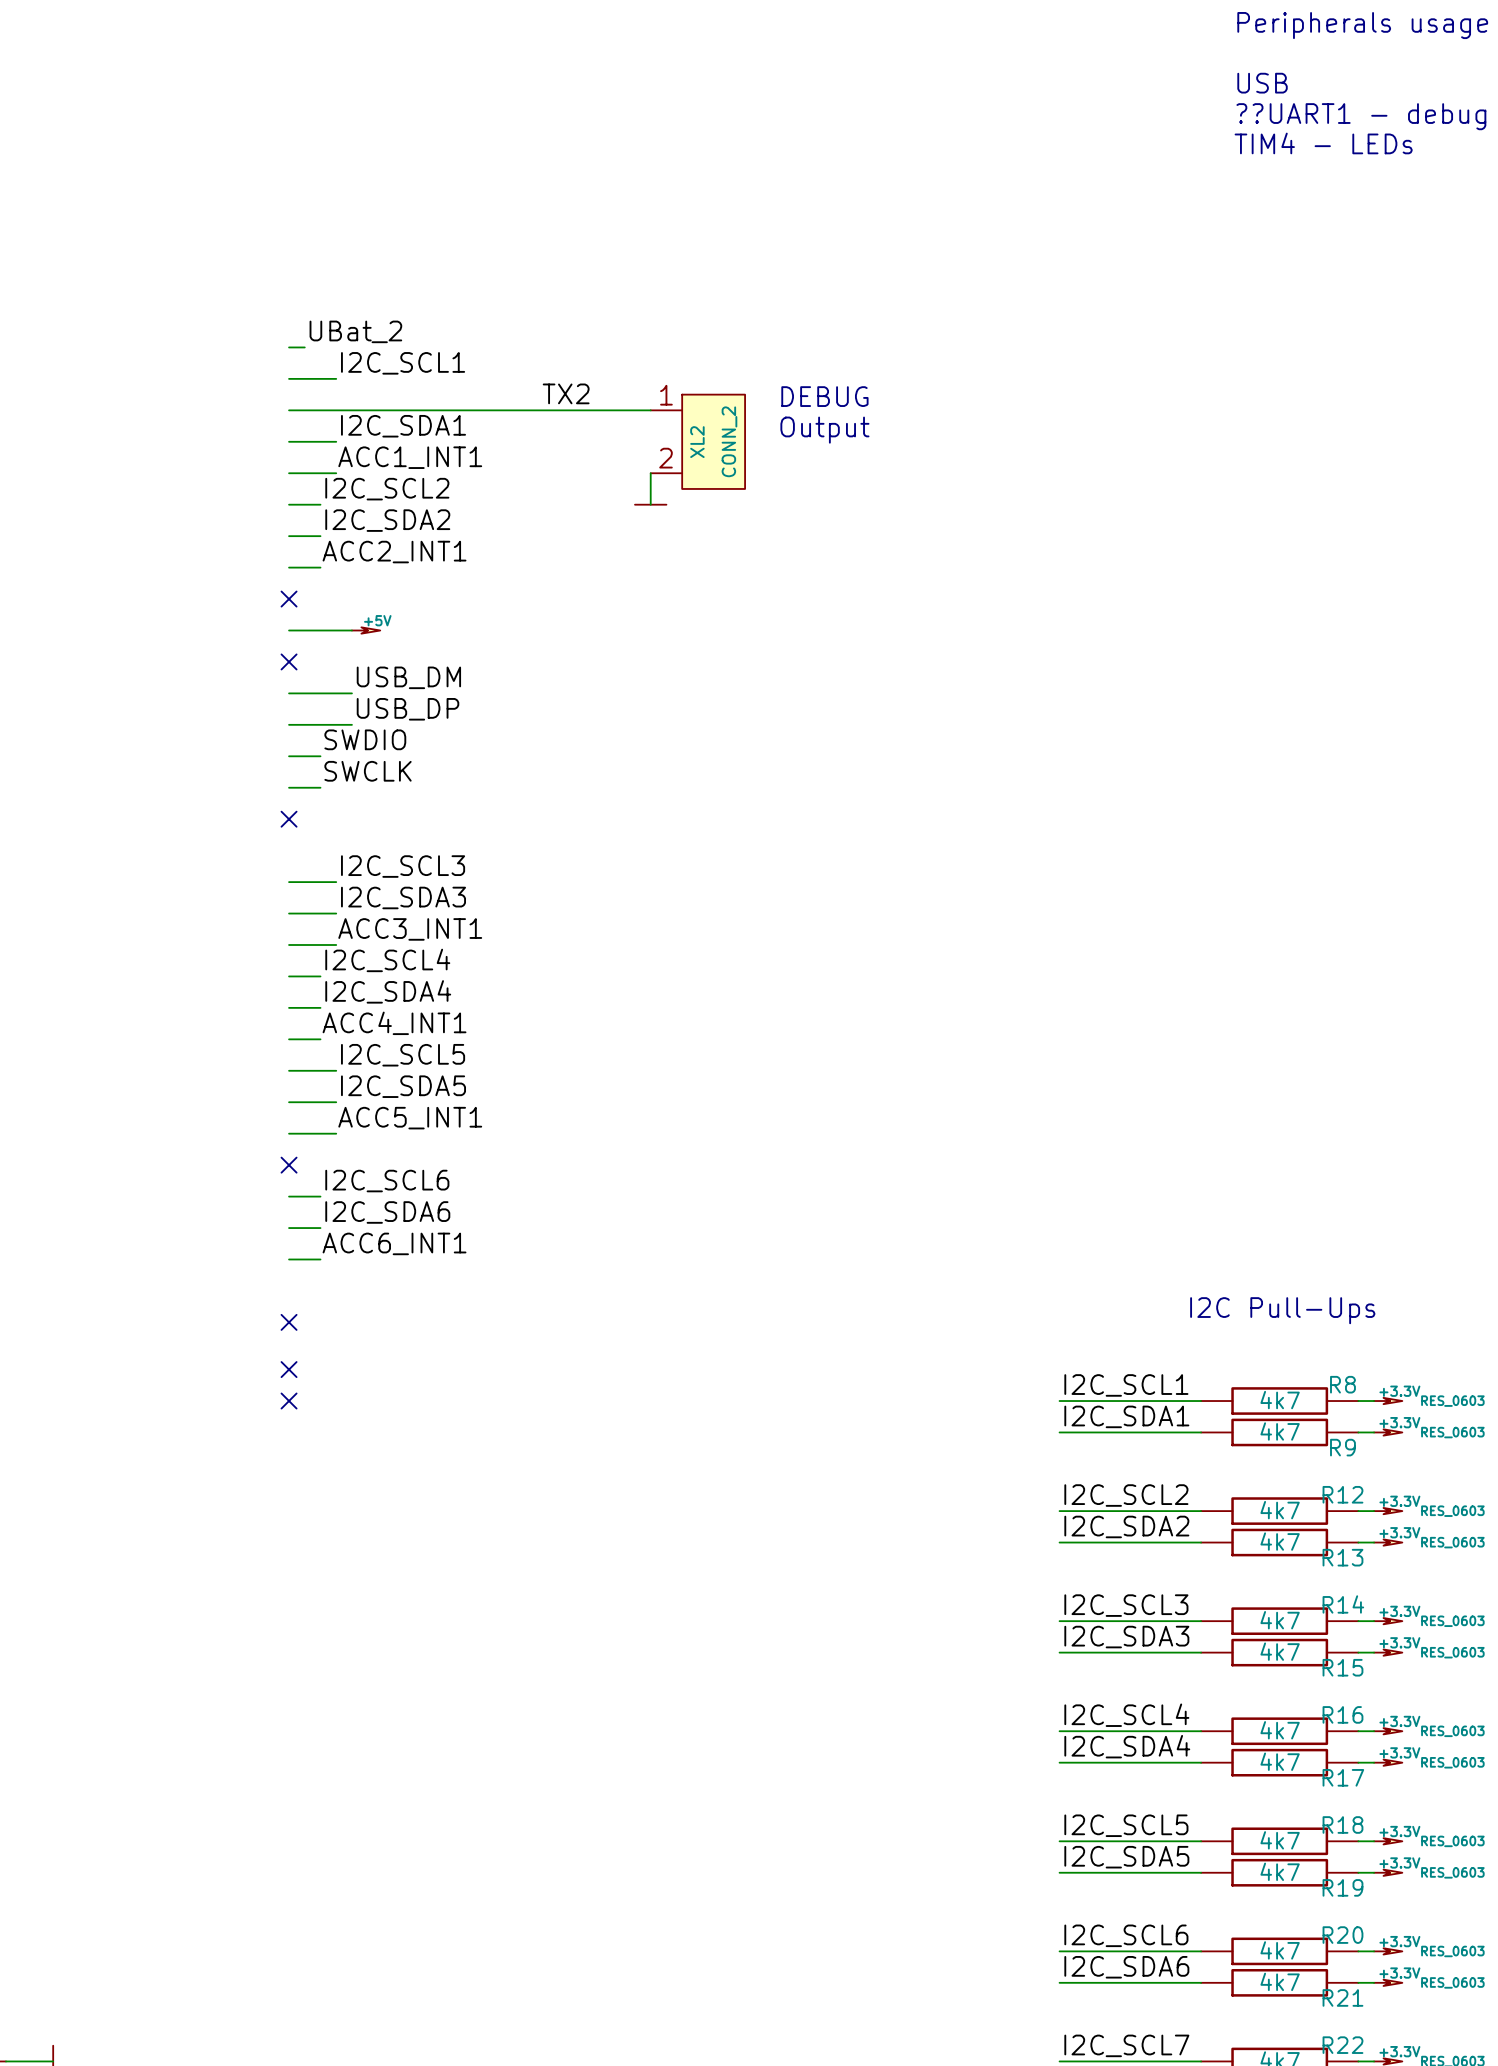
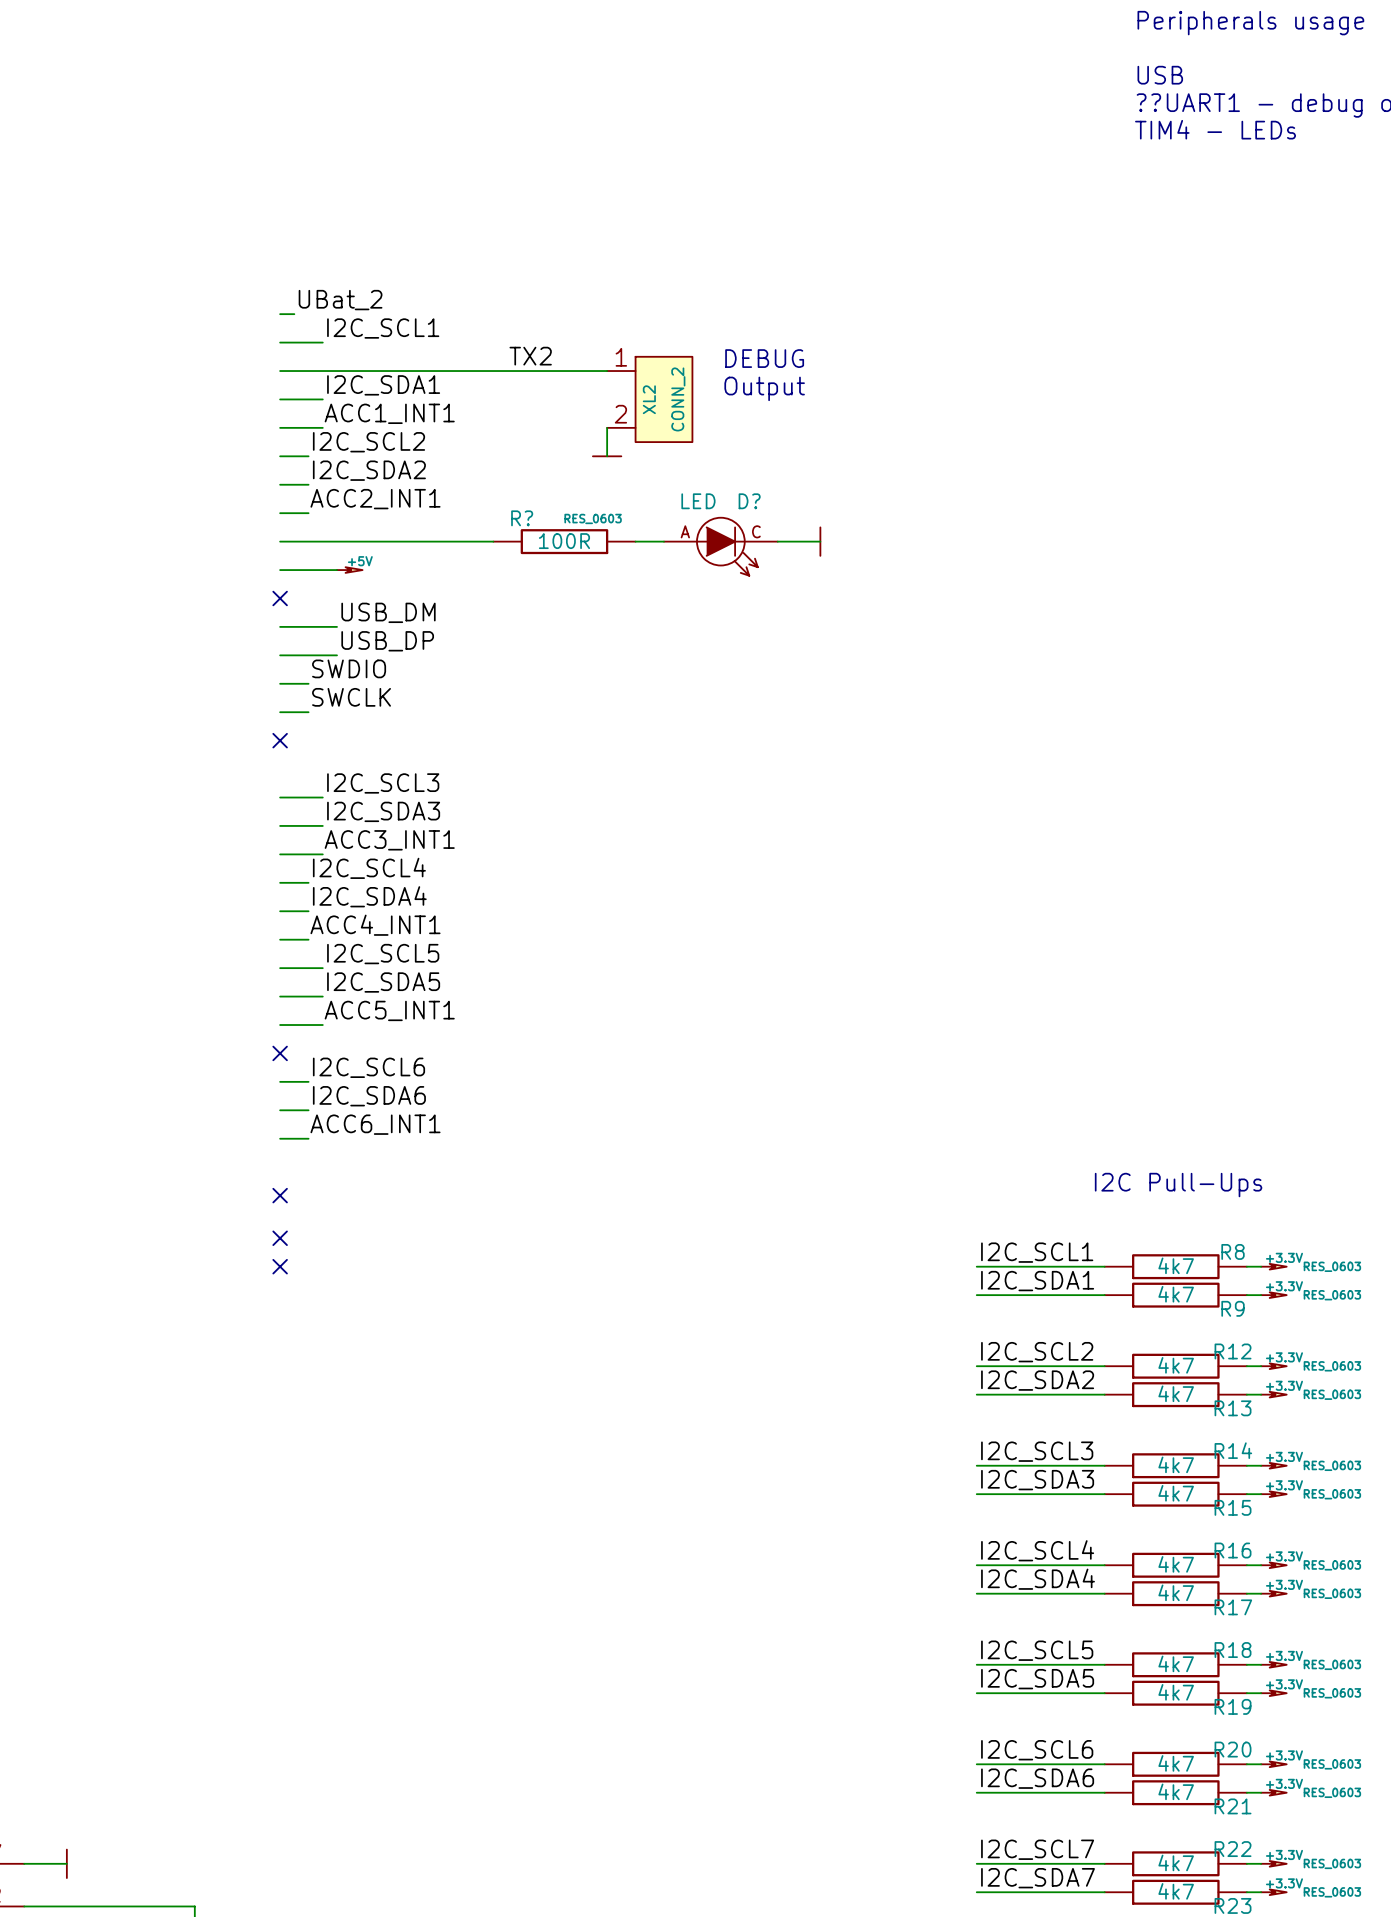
wire: none -> (280, 541) (493, 541)
no-connect mark: (289, 599) -> none
R?: none -> 100R (564, 541)
wire: none -> (635, 541) (663, 541)
wire: none -> (777, 541) (820, 541)
power symbol: none -> (820, 541)
D?: none -> LED (720, 546)

